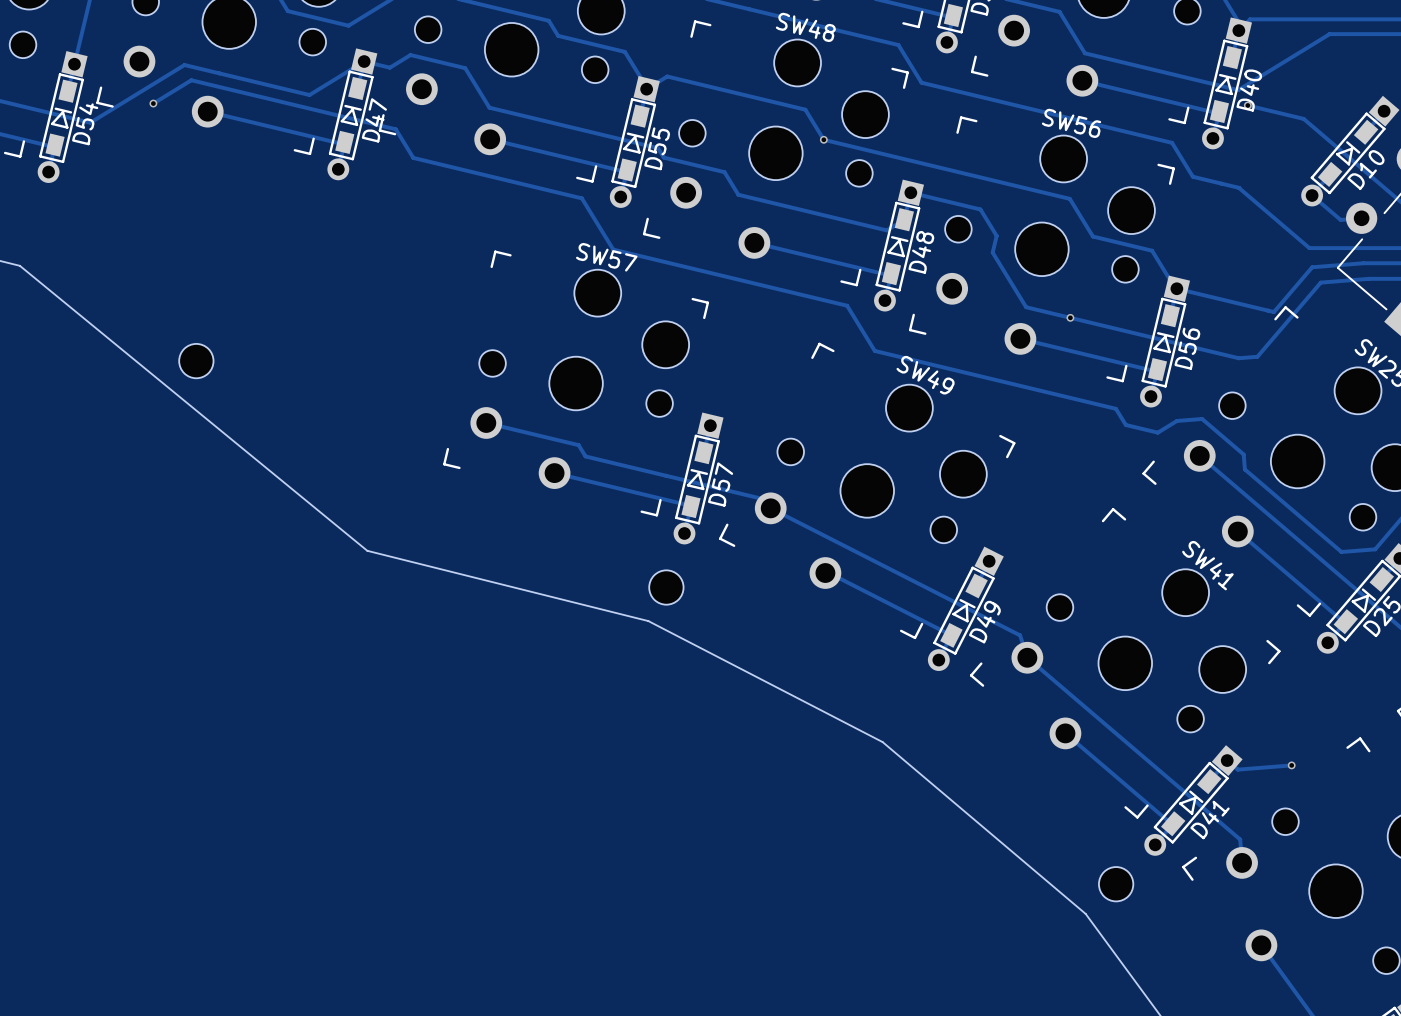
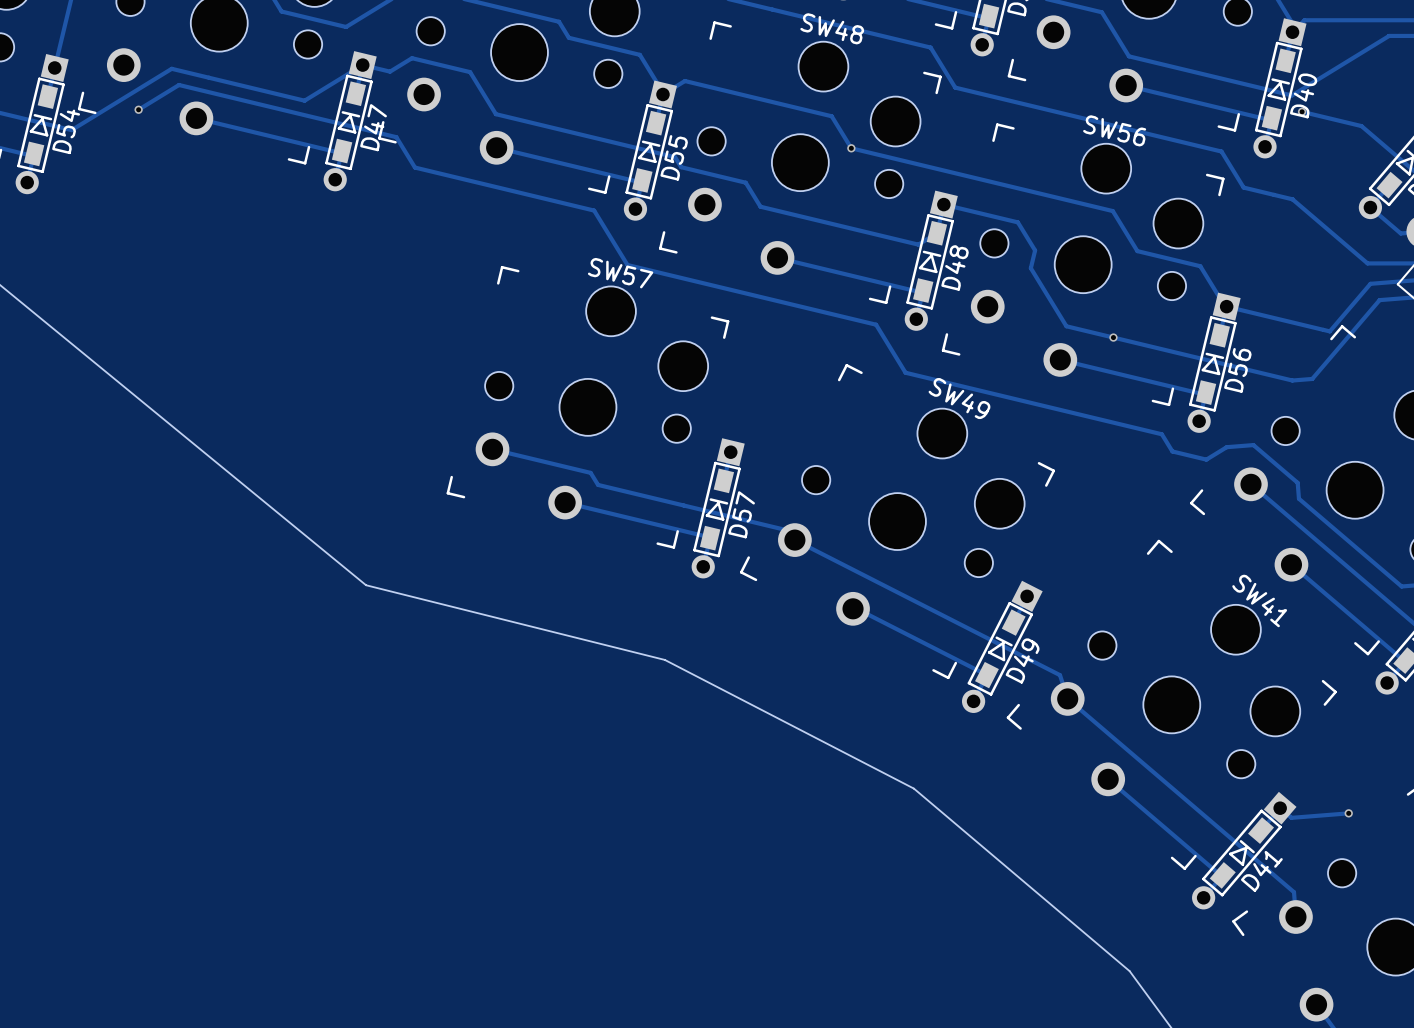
part: (196, 361) -> none
part: (666, 587) -> none
part: (1116, 884) -> none

